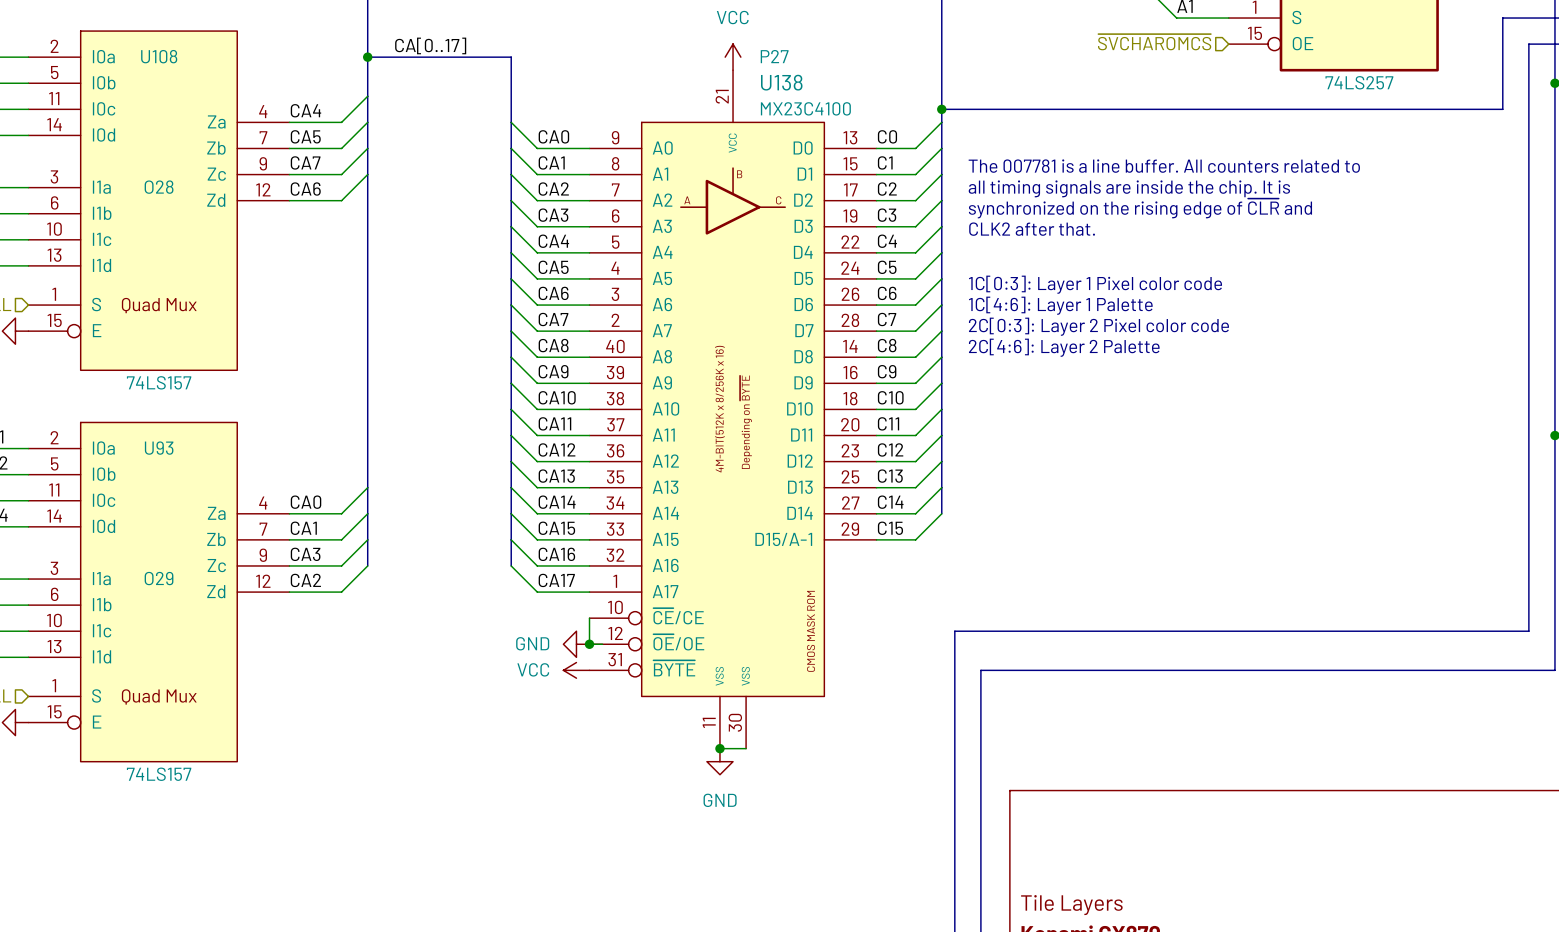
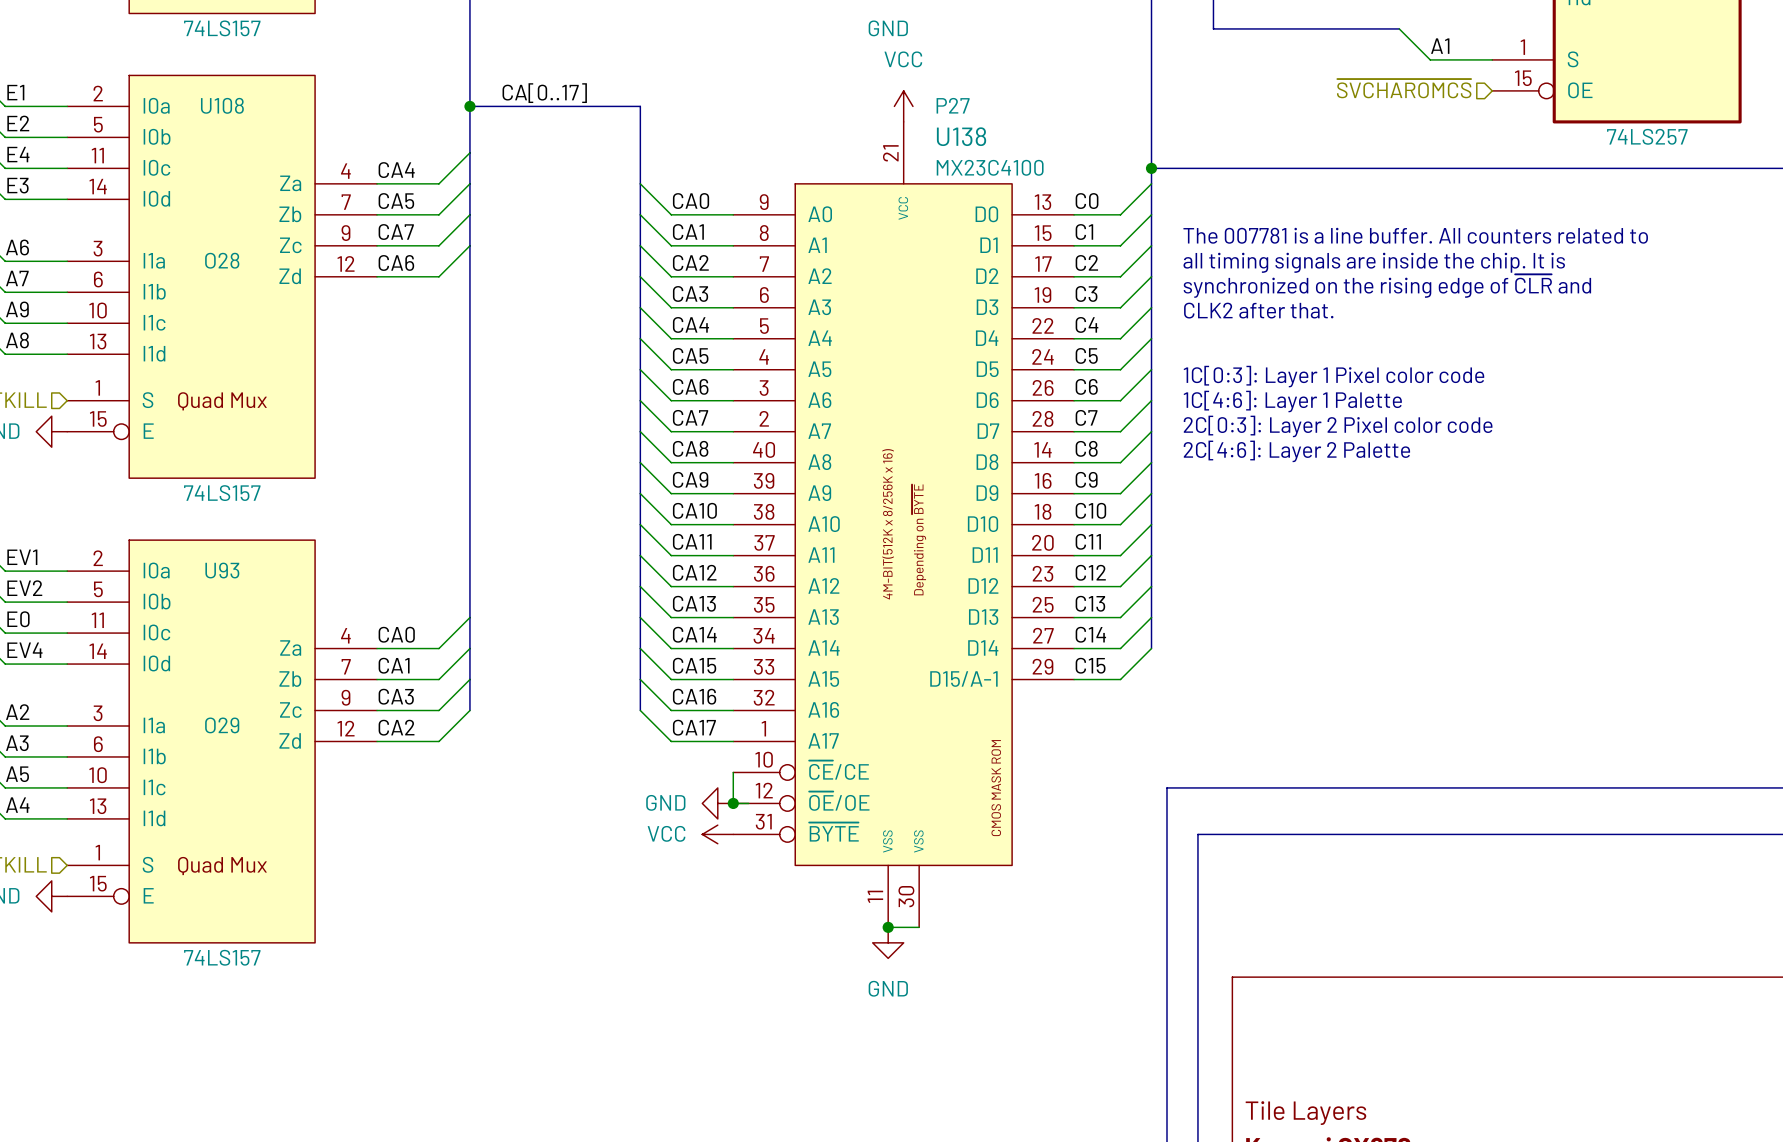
U138 symbol: [589, 70, 877, 749] -> [733, 121, 1075, 928]

